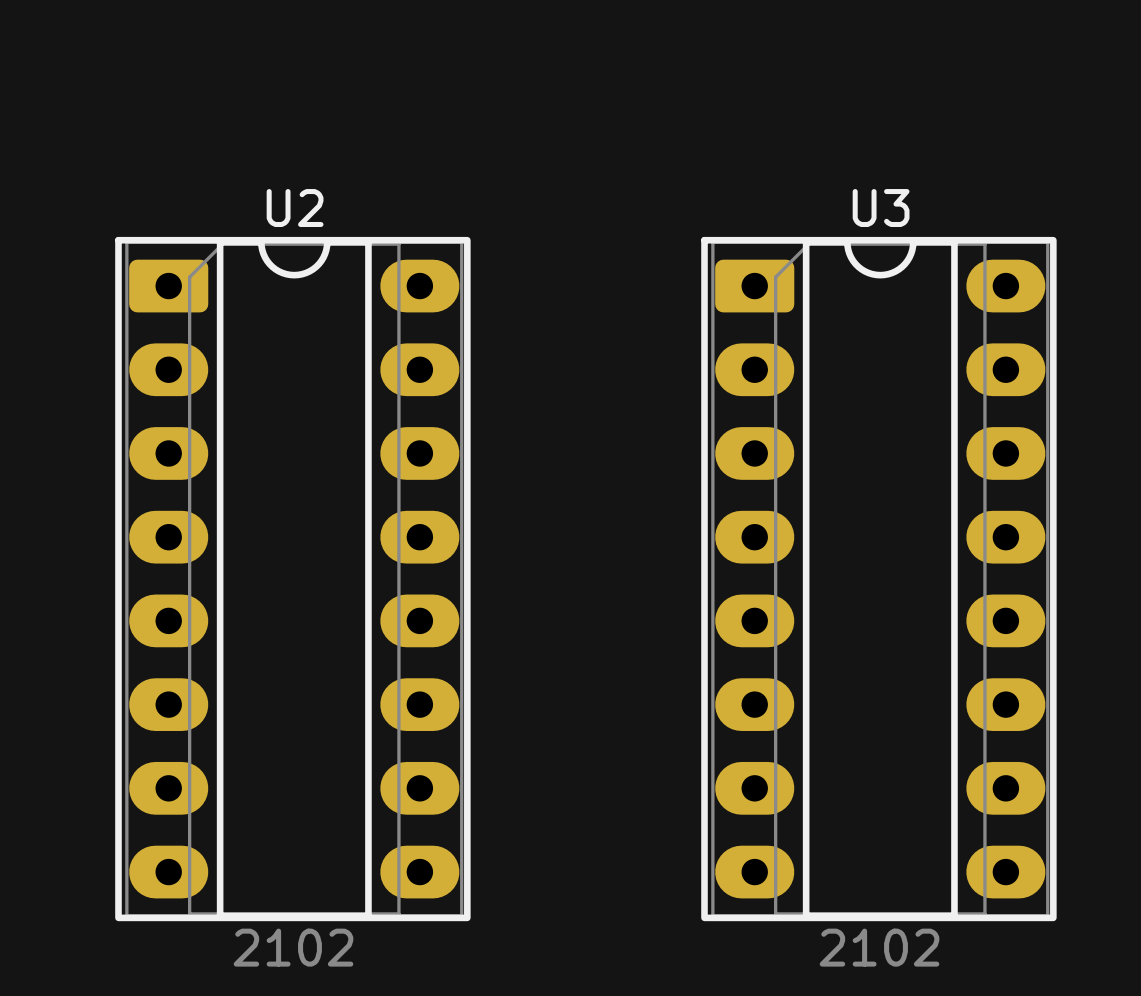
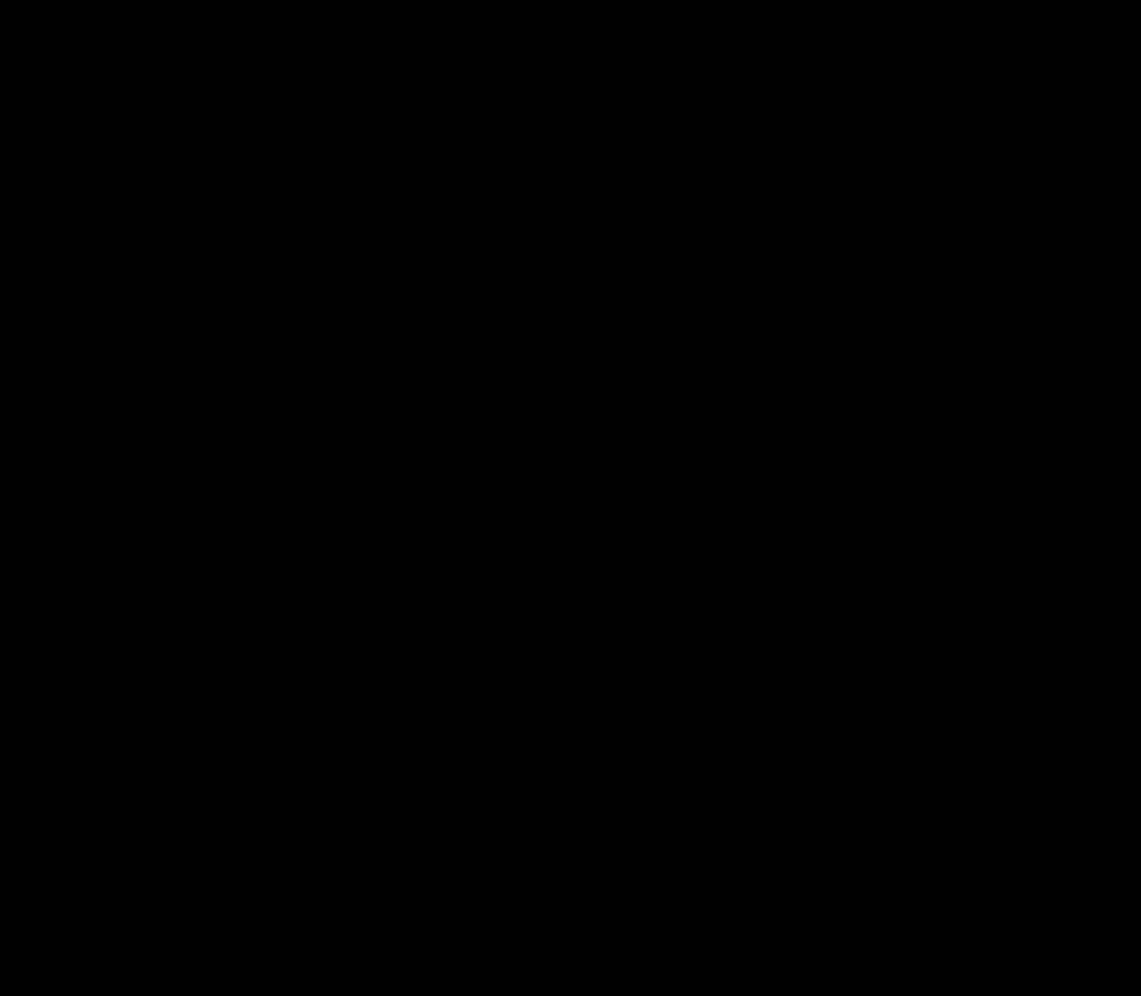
U2: 2102 (292, 579) -> none
U3: 2102 (878, 579) -> none

